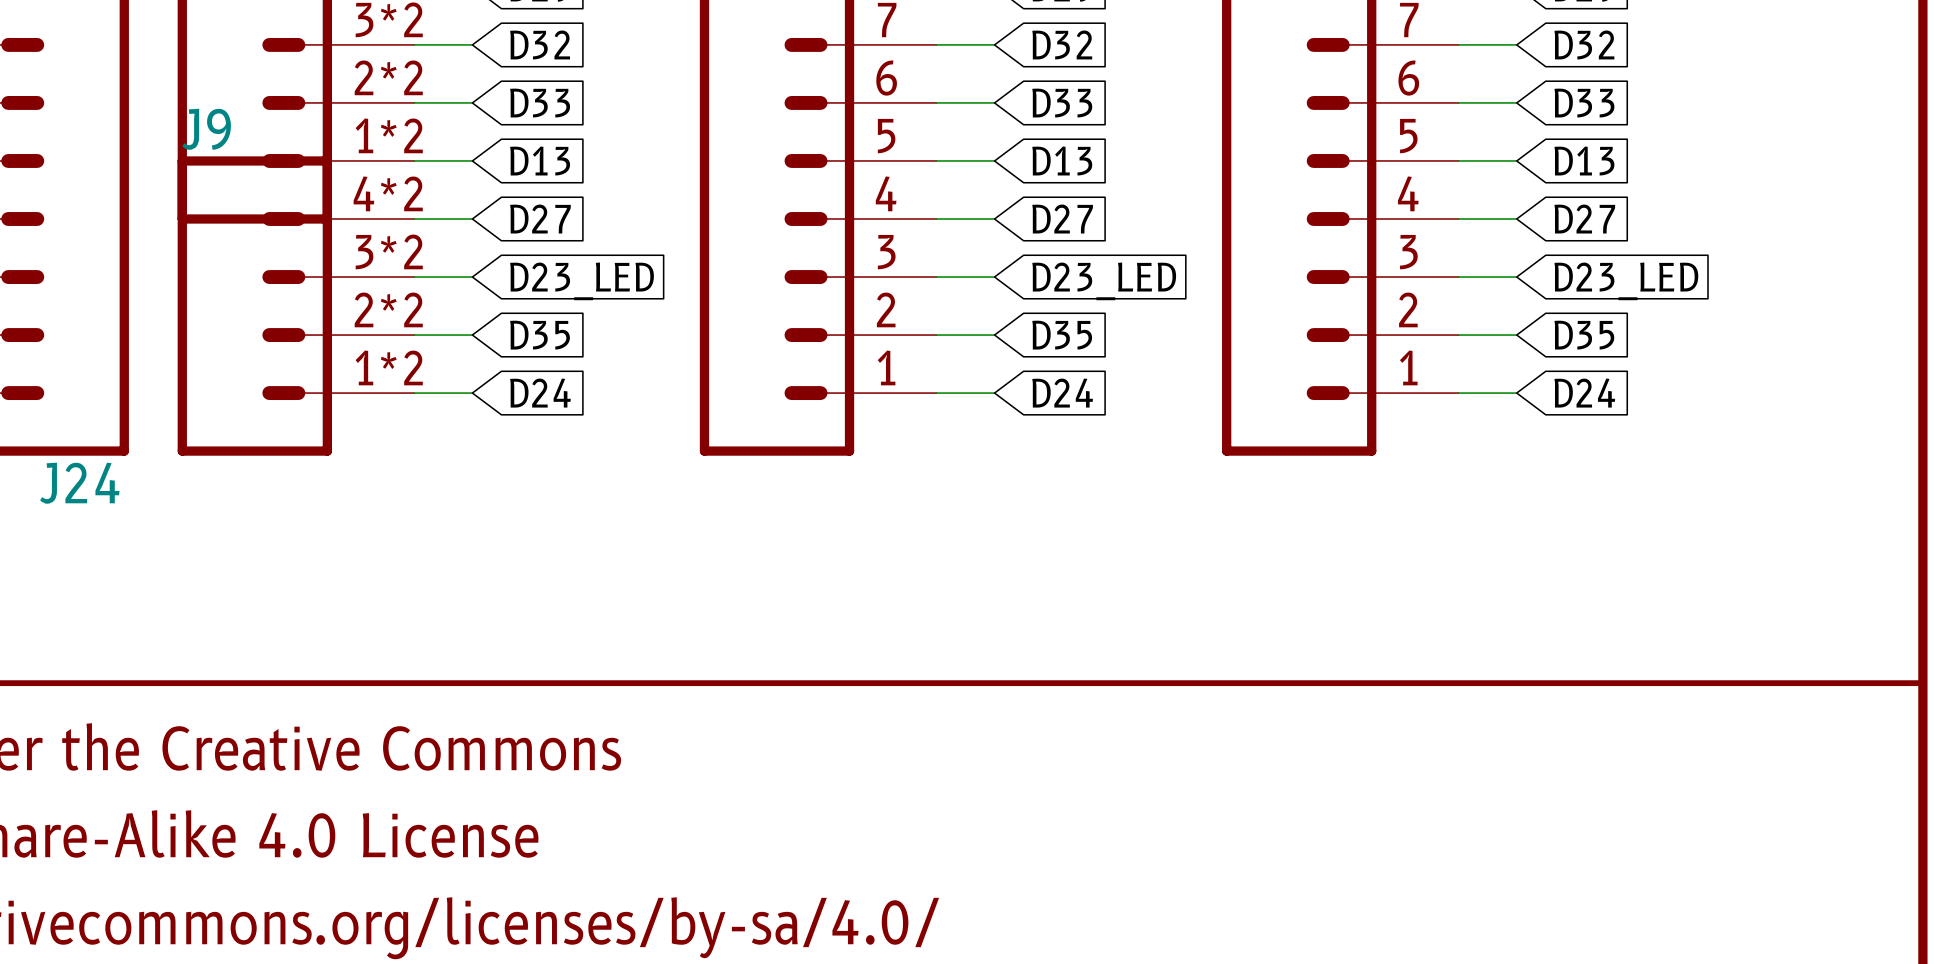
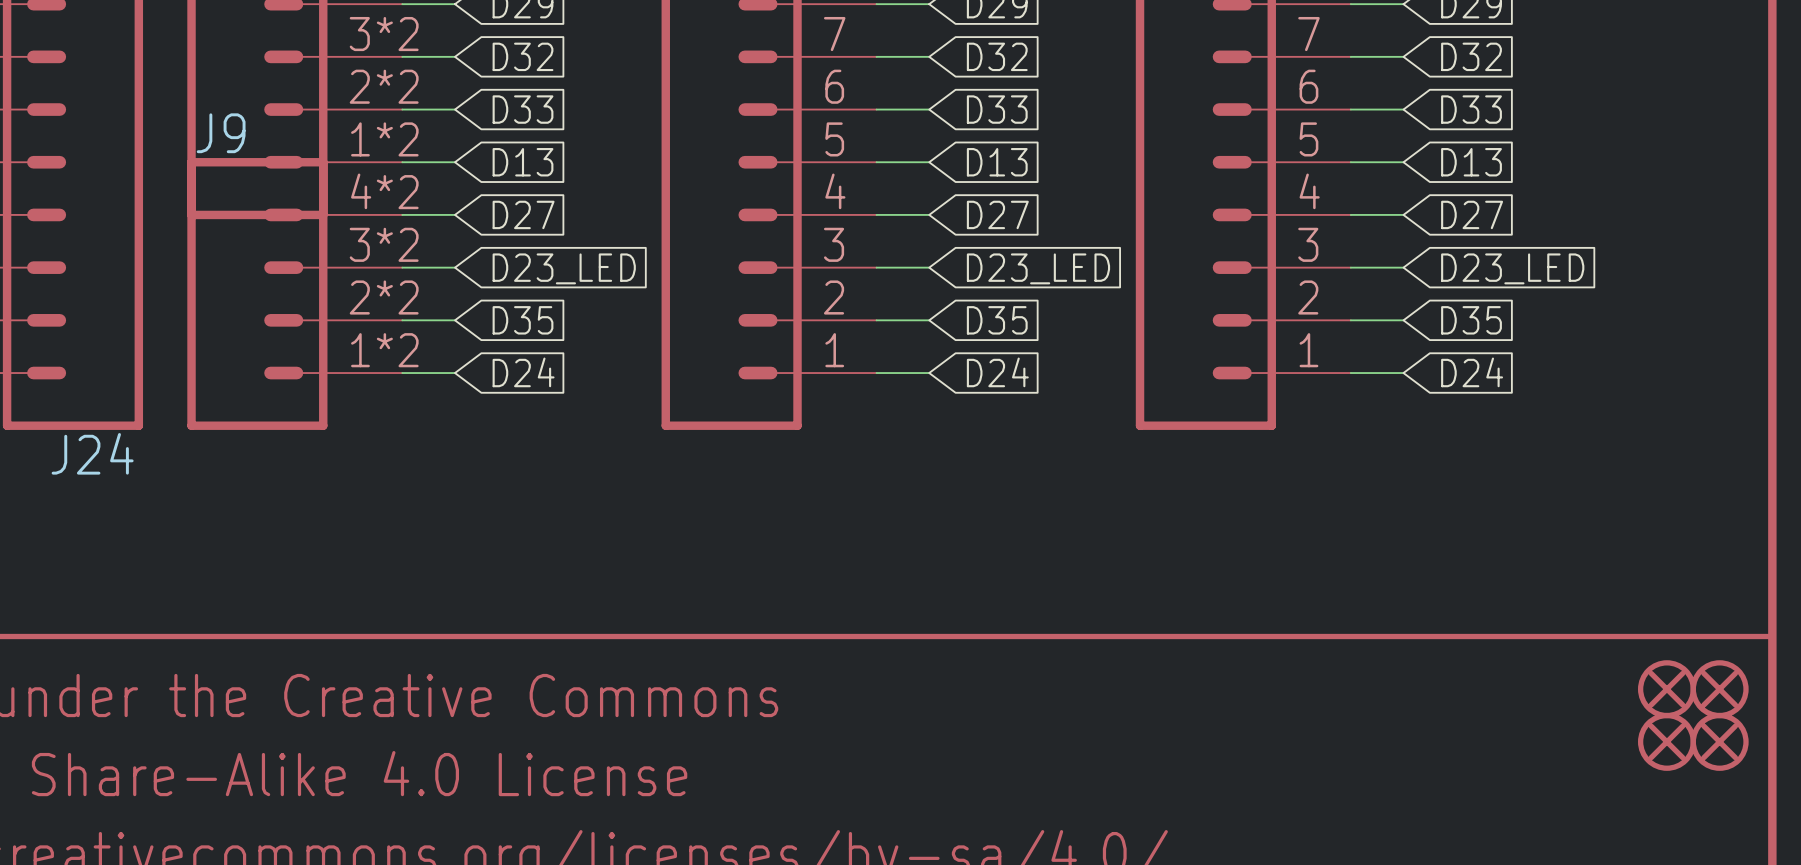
part: none -> (1666, 689)
part: none -> (1719, 689)
part: none -> (1666, 741)
part: none -> (1719, 741)

